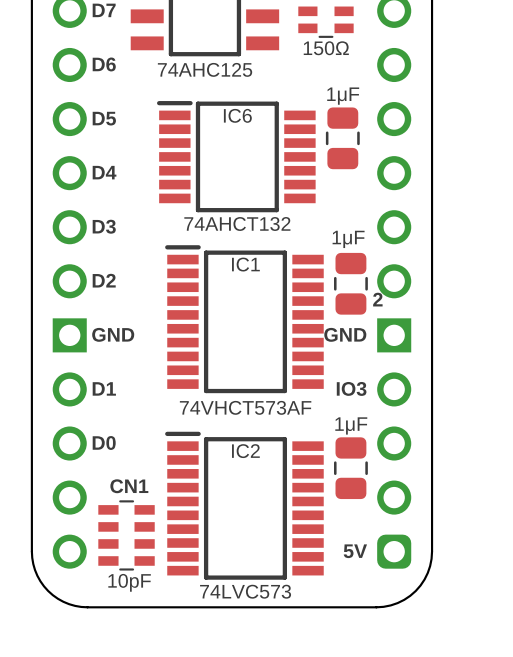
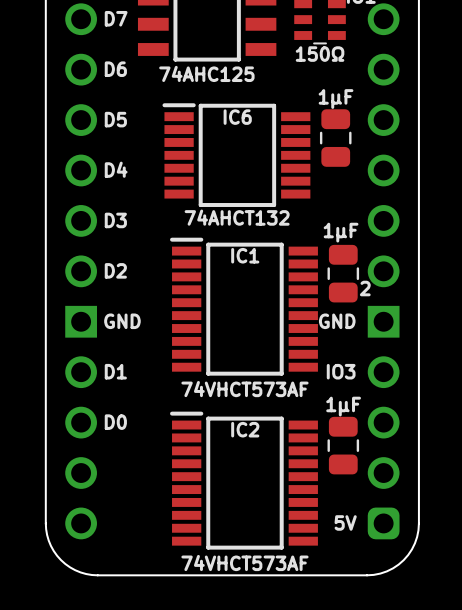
CN1: (126, 535) -> none
IC2 text: 74LVC573 (245, 591) -> none
IC2 text: none -> 74VHCT573AF (244, 563)

